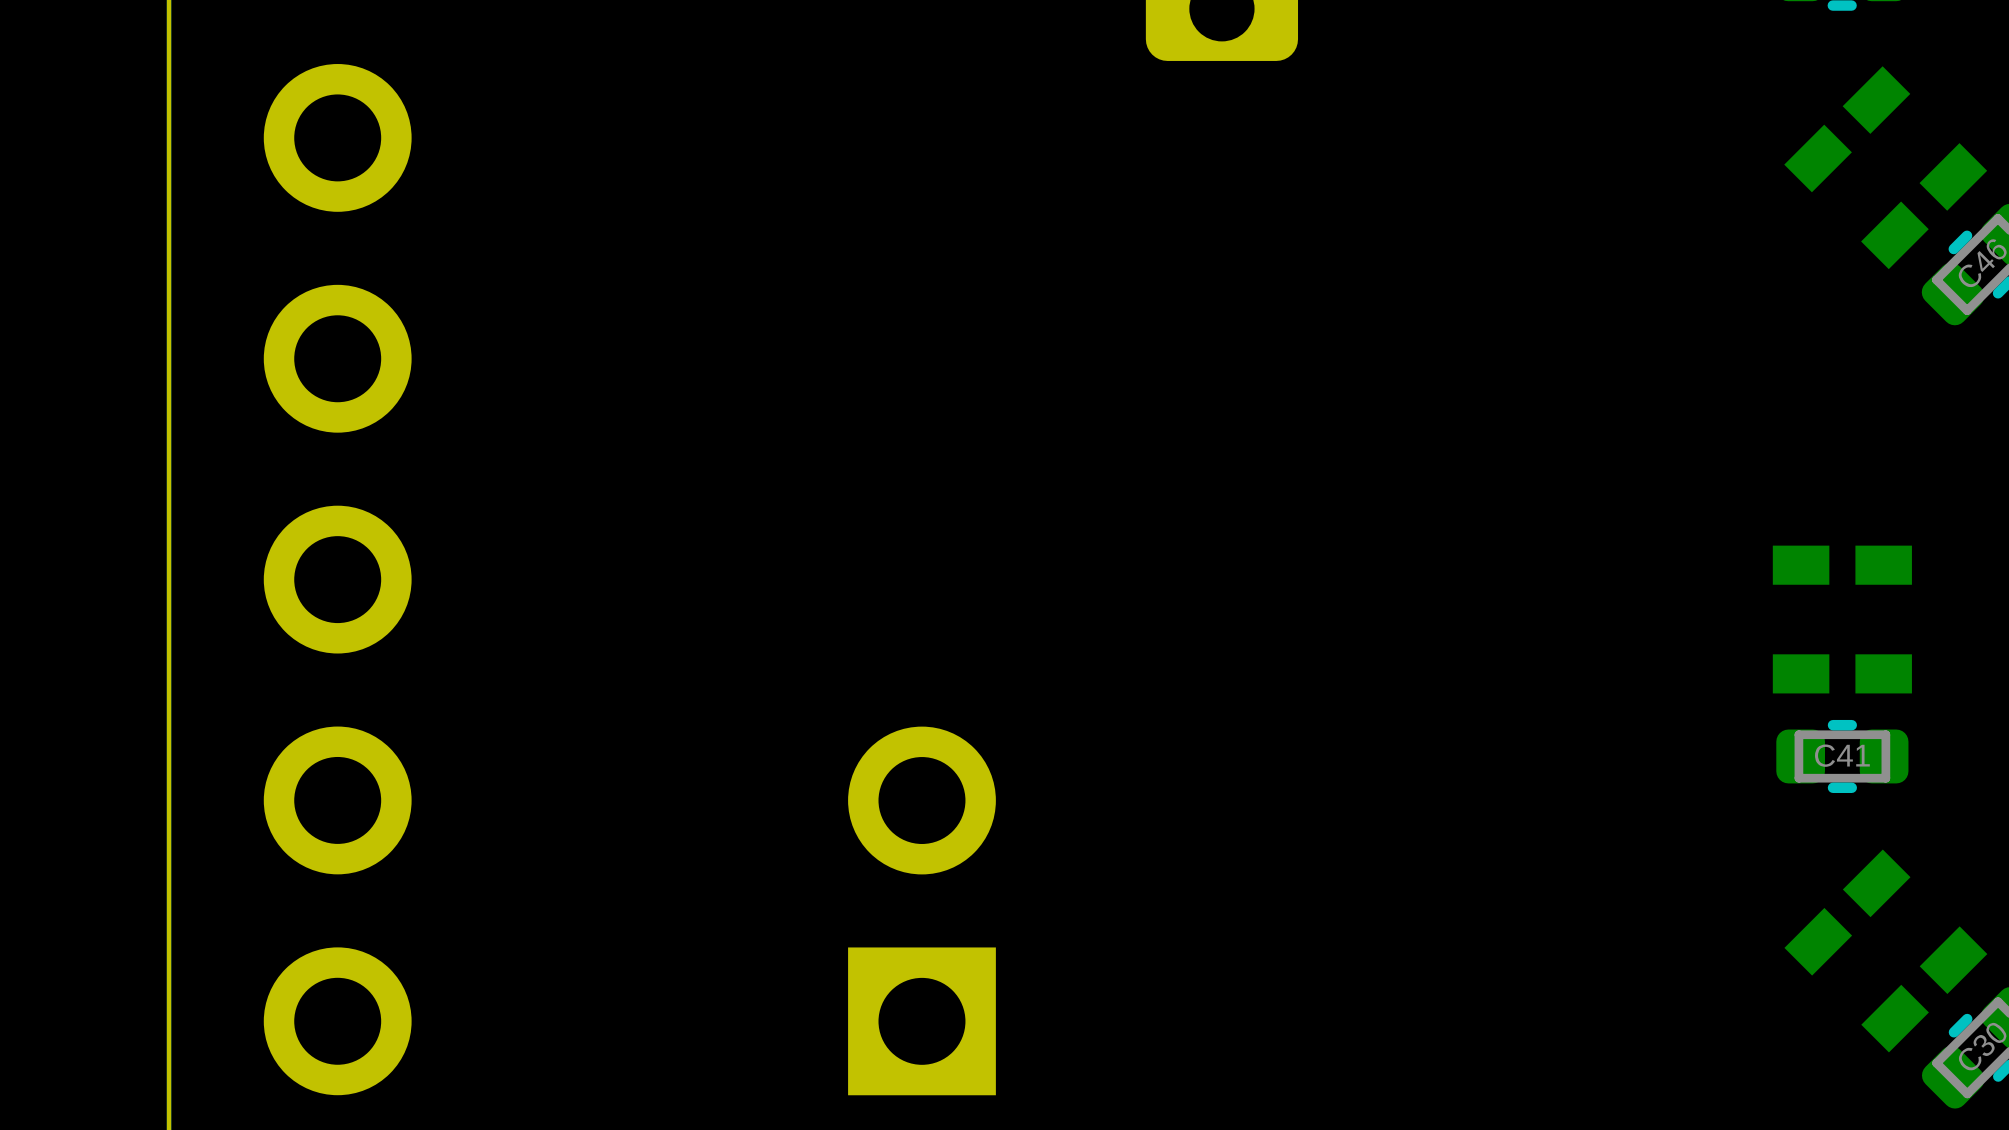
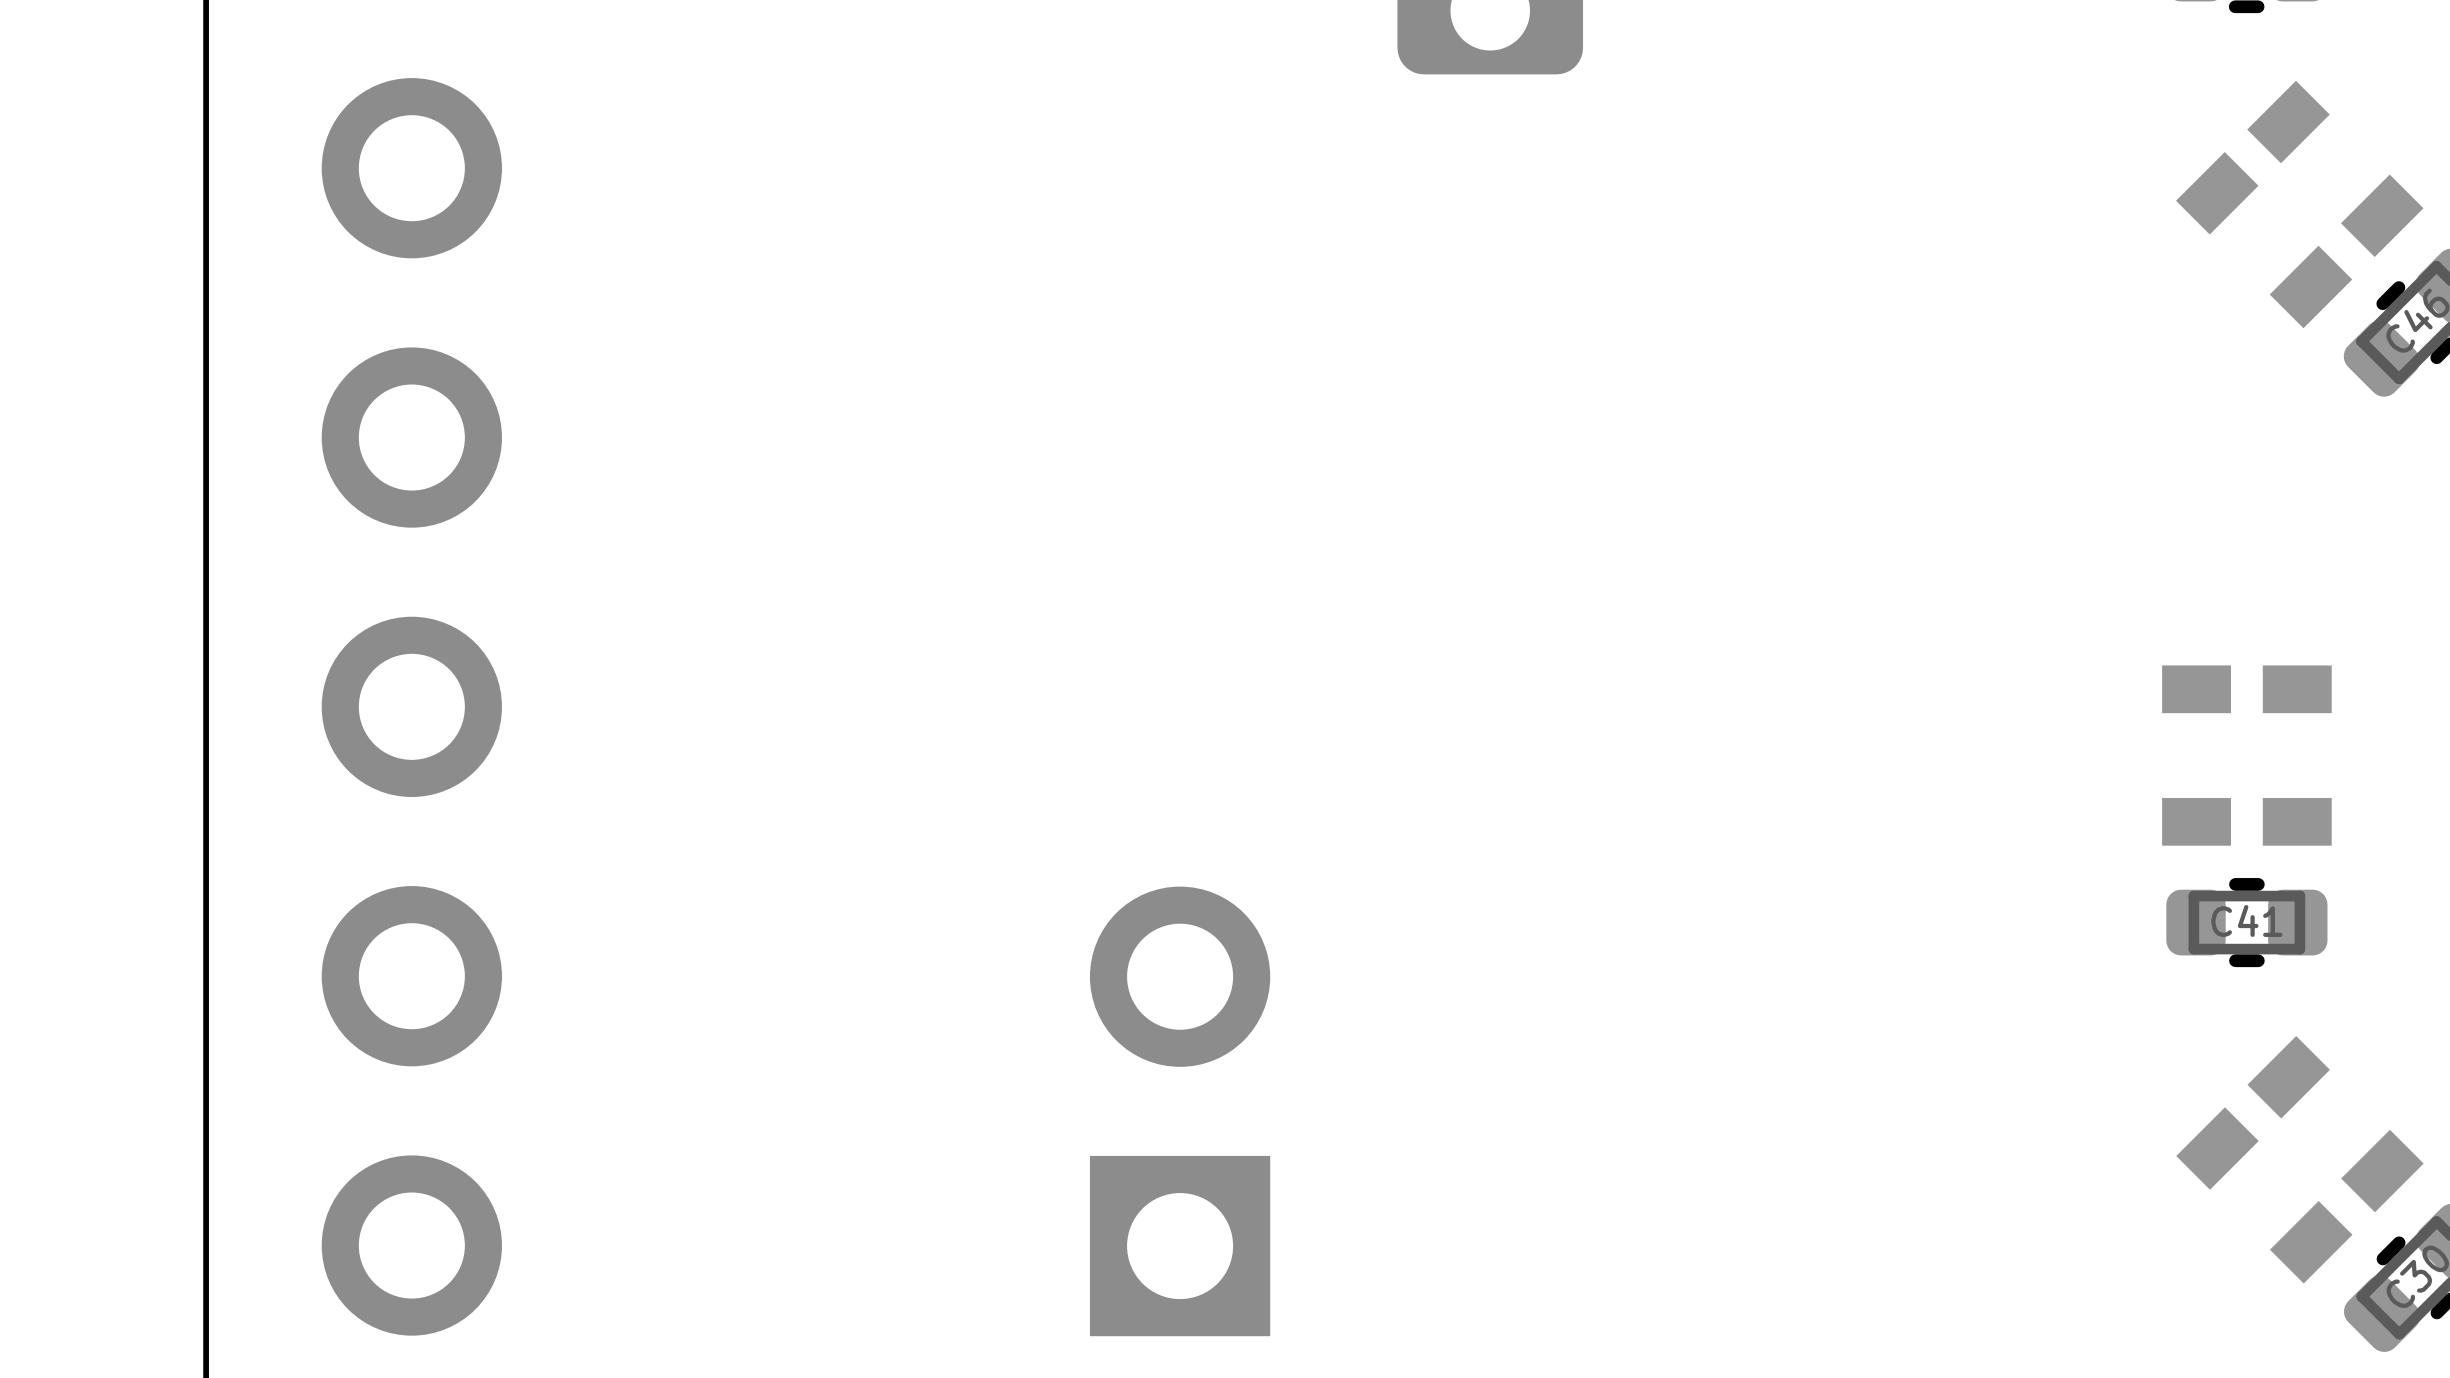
part position: (921, 910) -> (1180, 1111)

